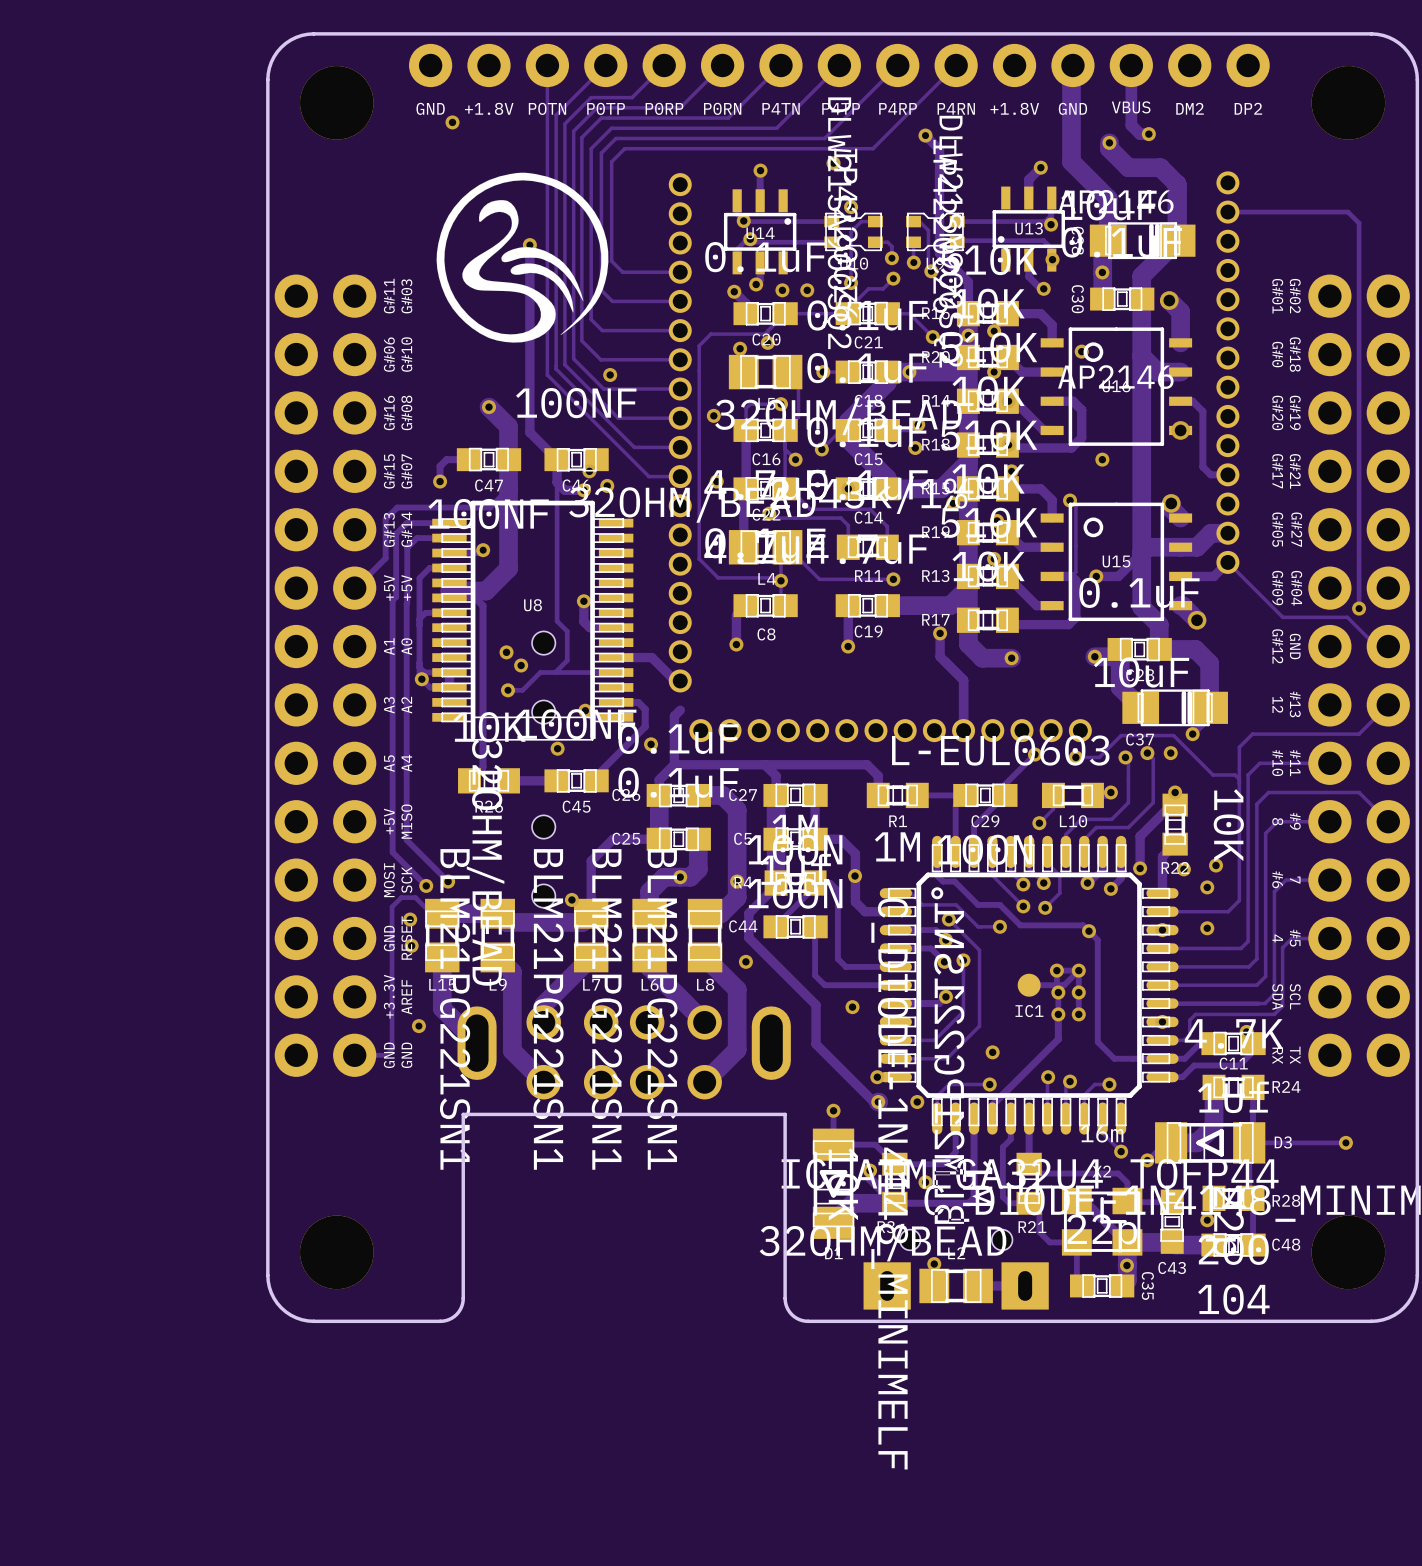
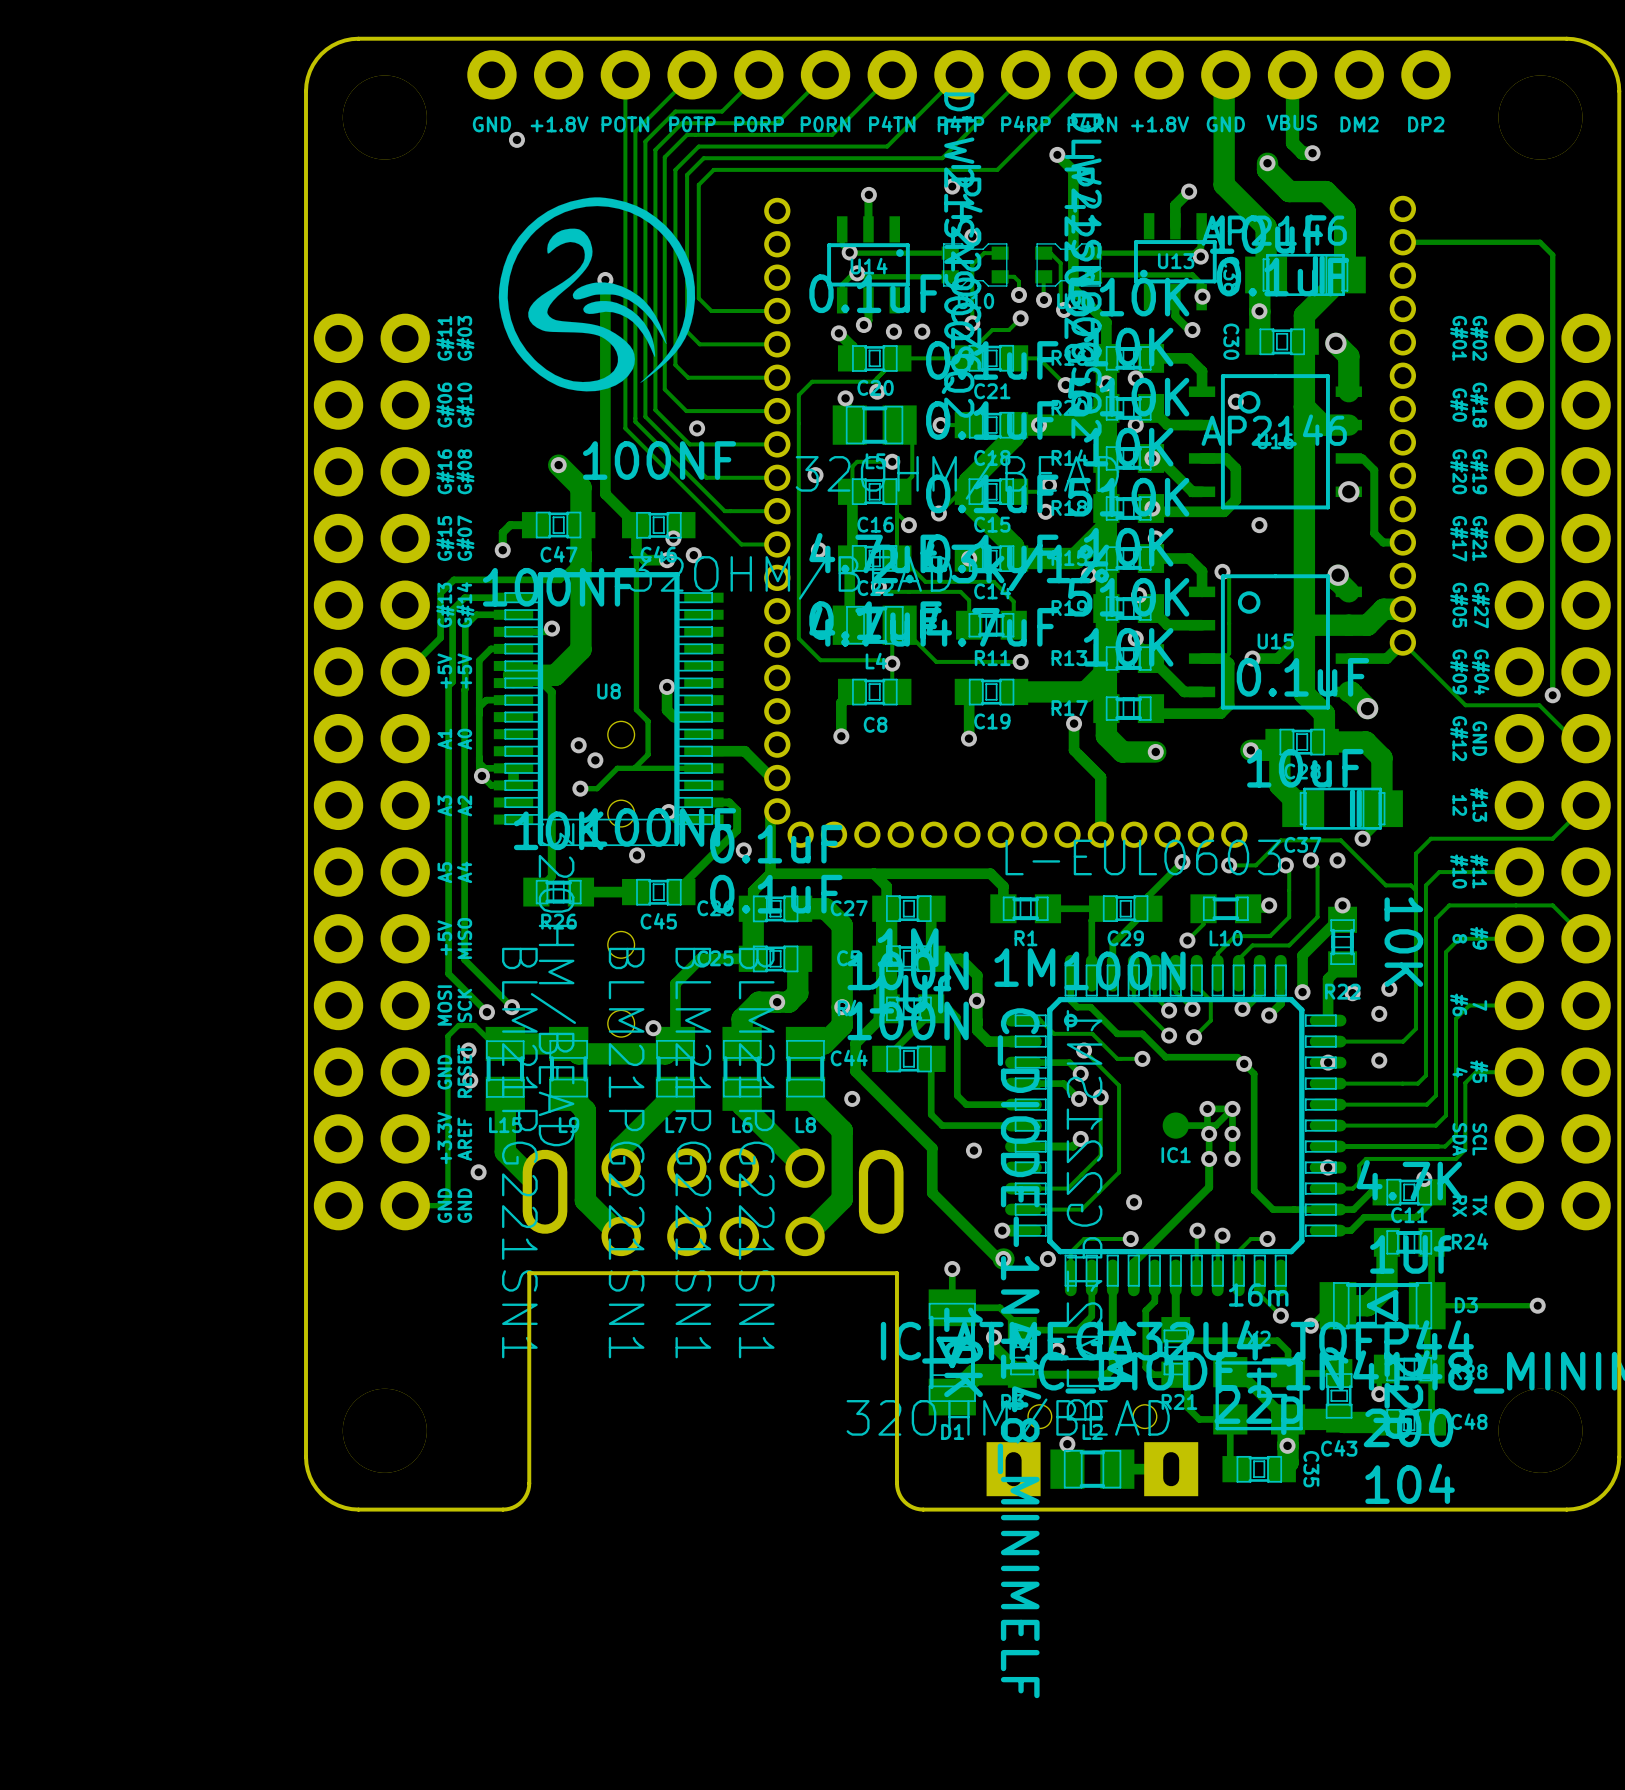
part footprint: [668, 173, 692, 693] -> [764, 197, 791, 825]

